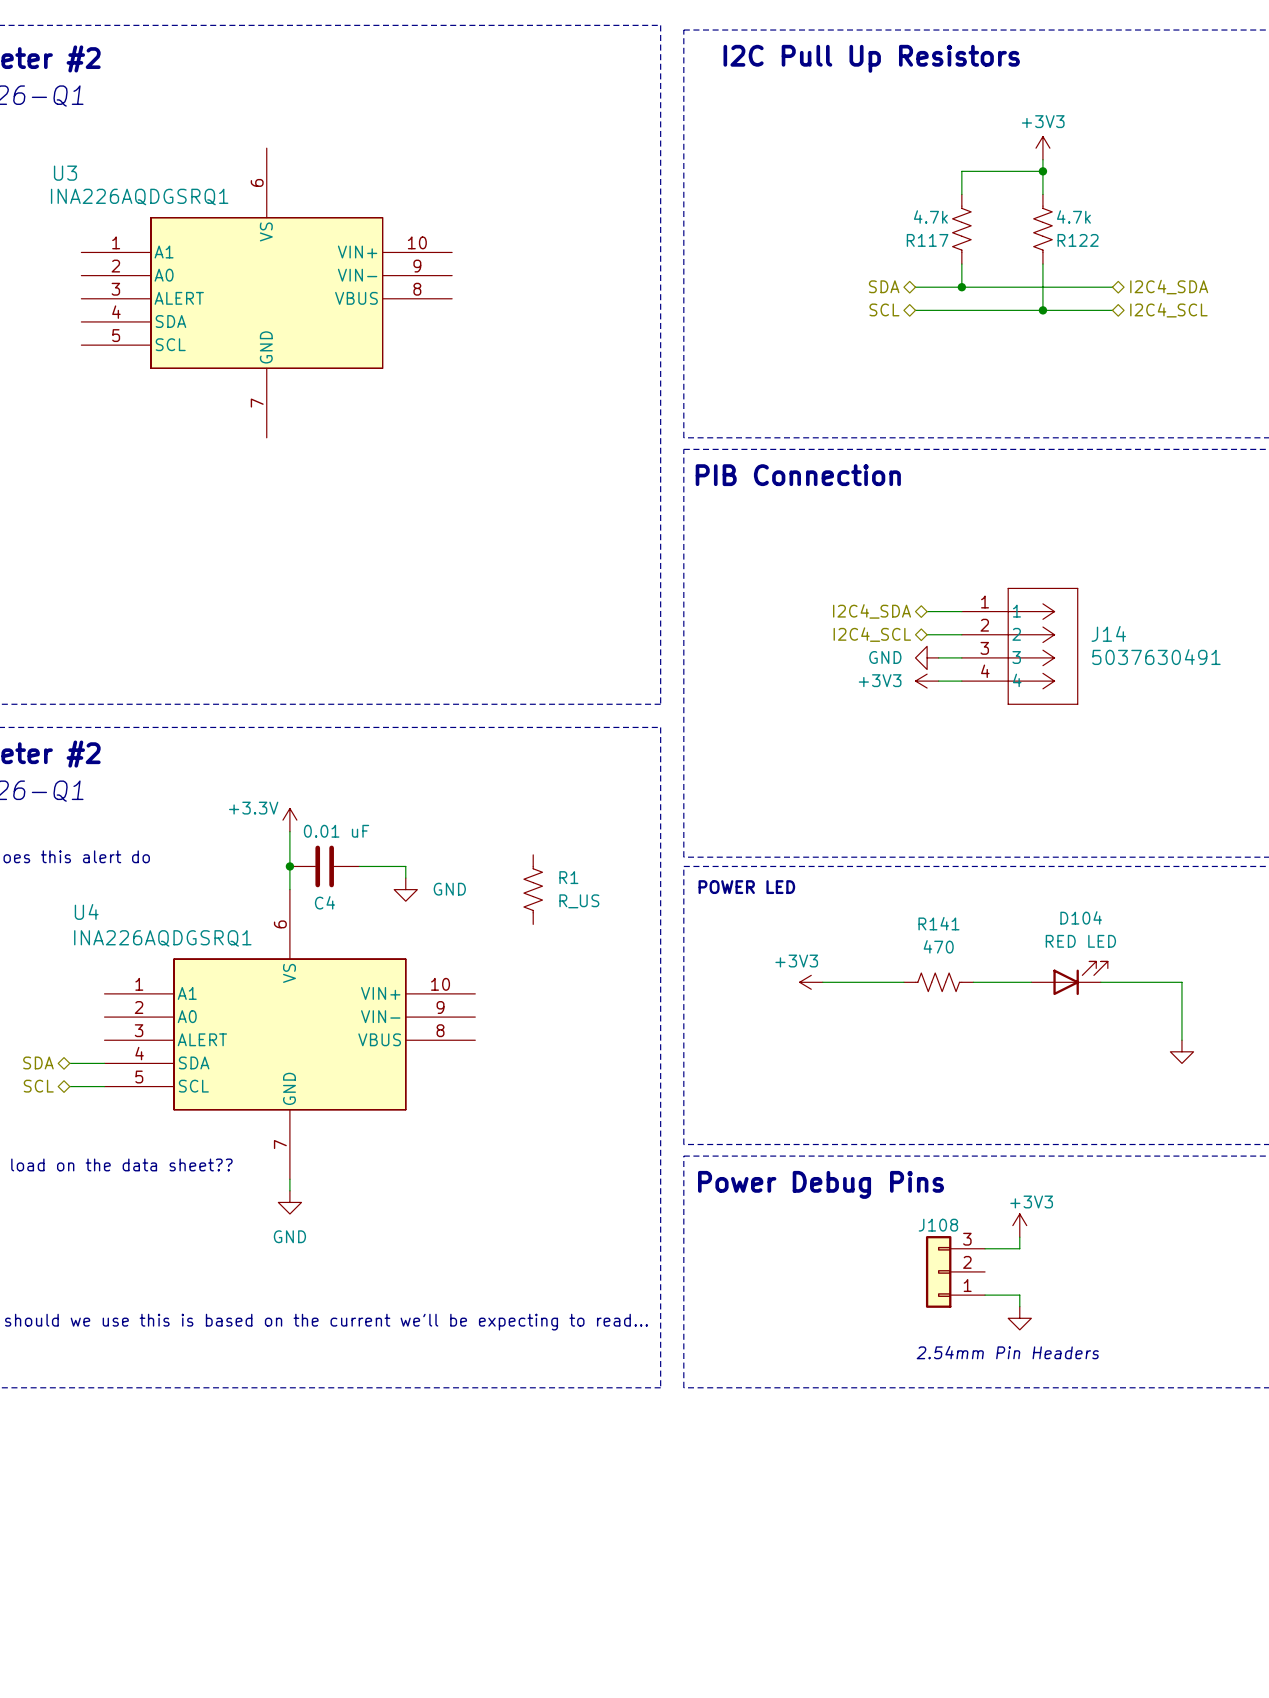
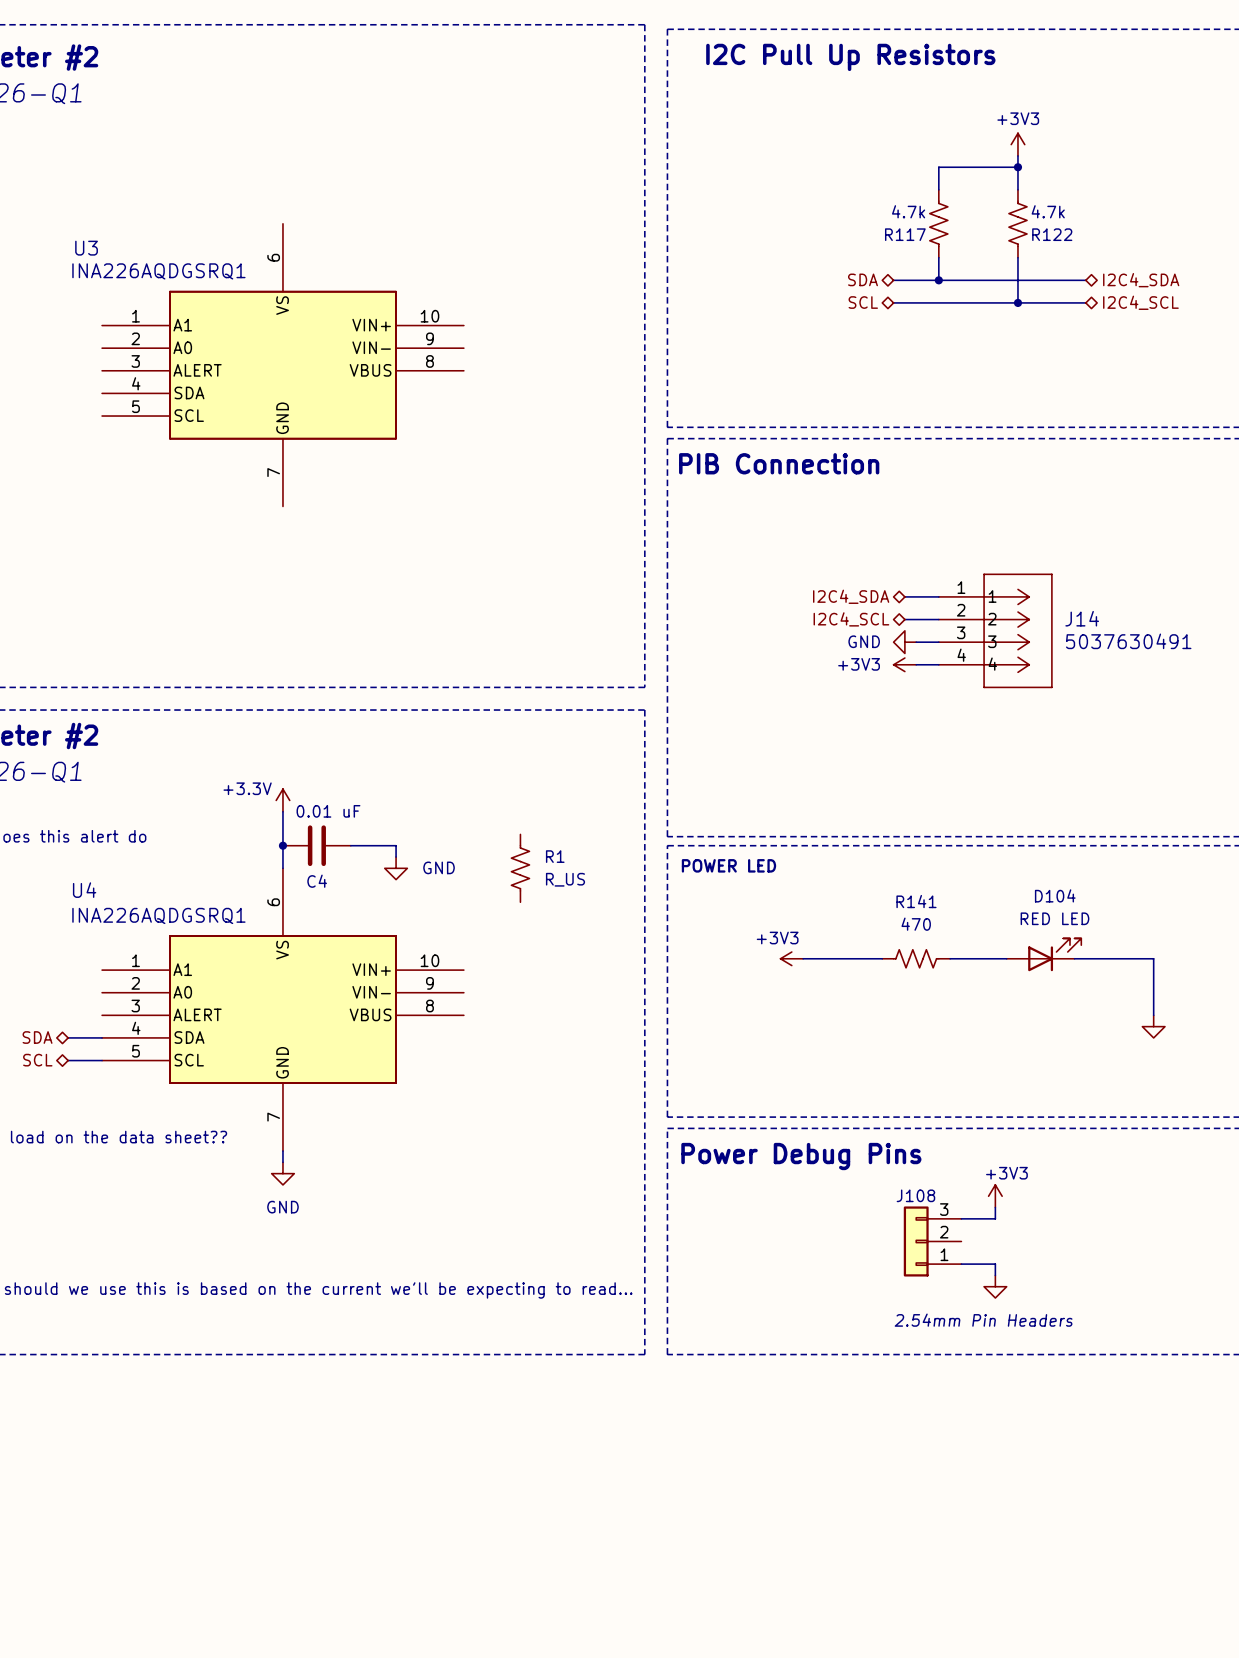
U3 position: (266, 292) -> (282, 365)

